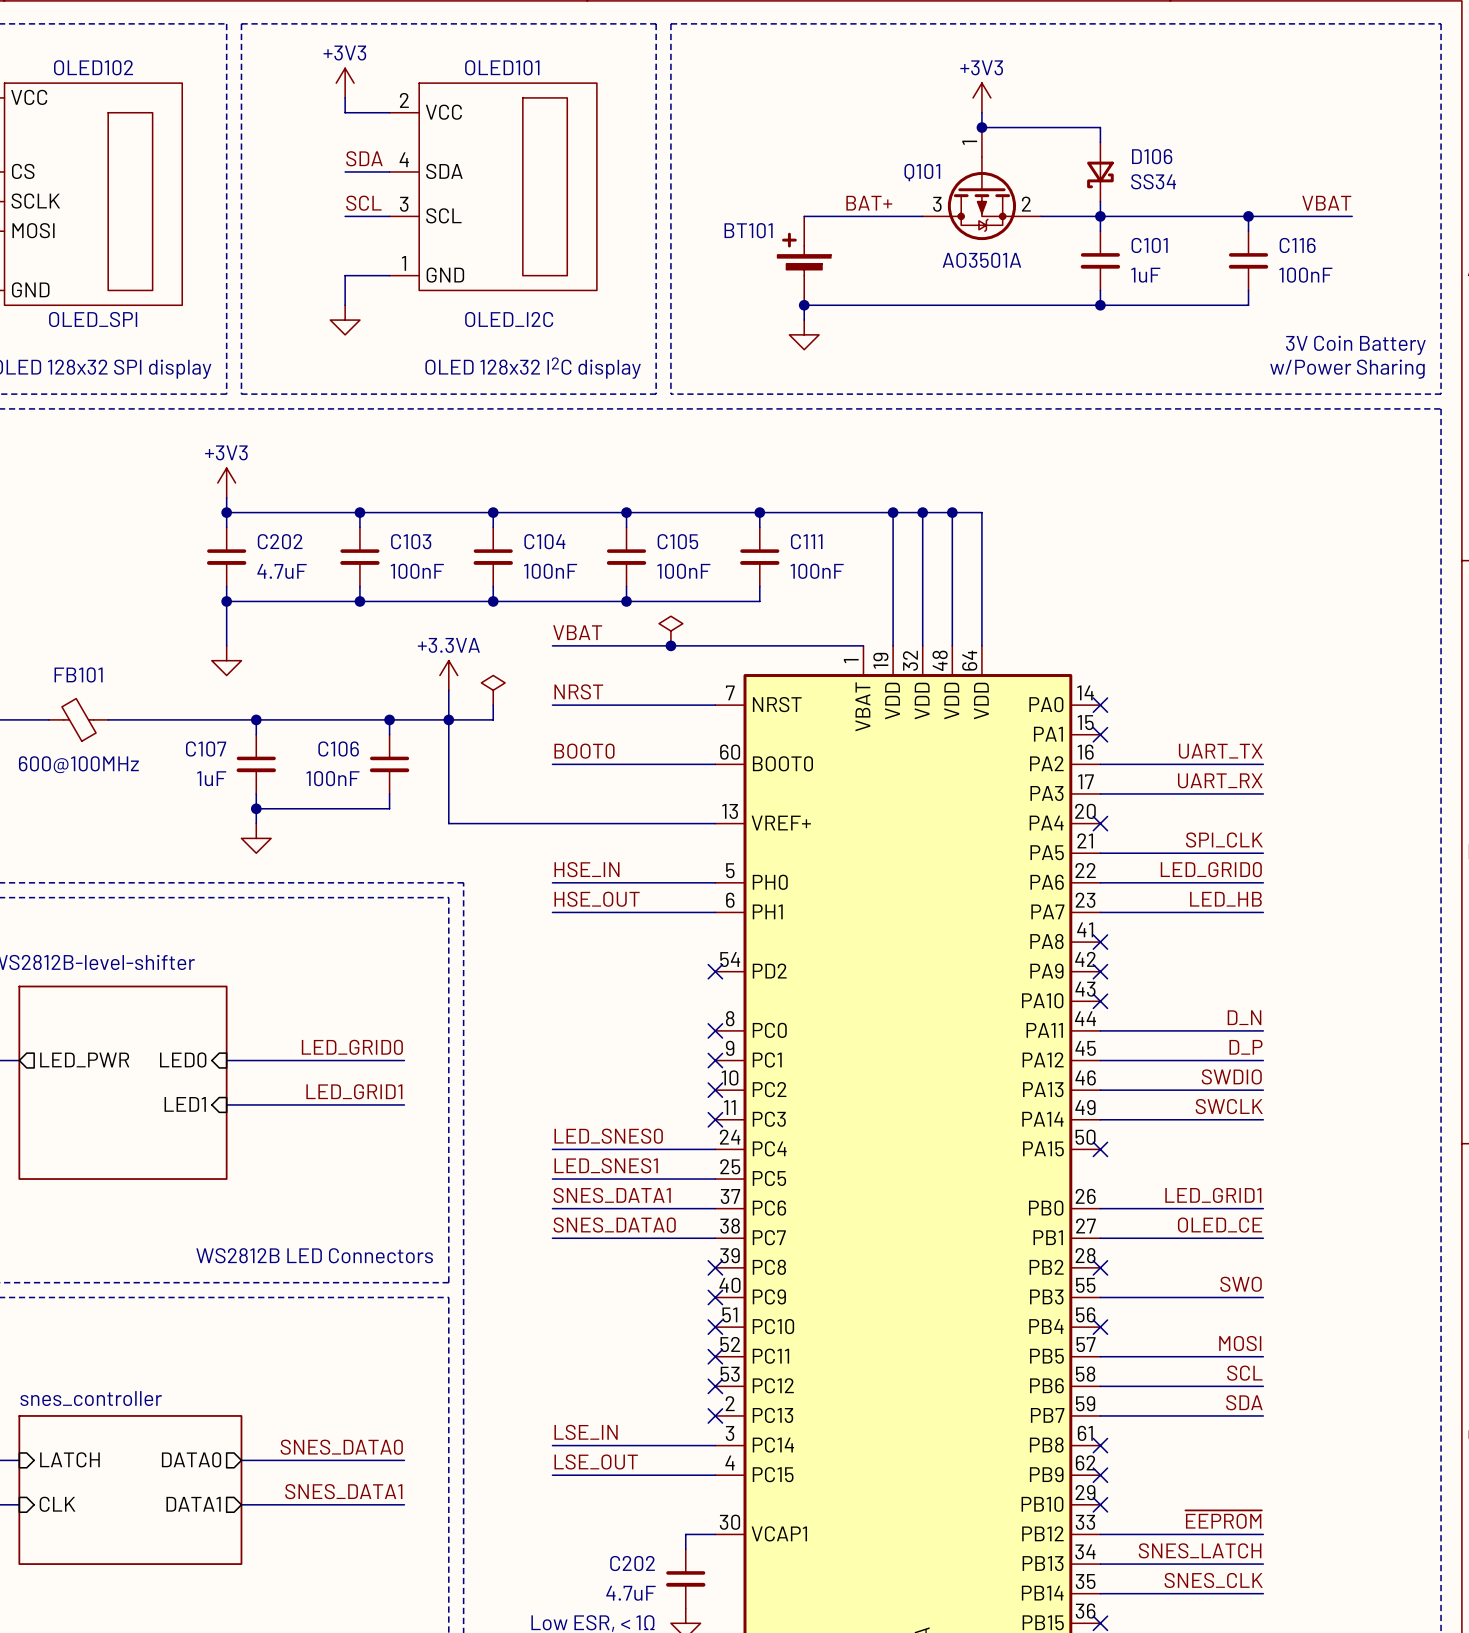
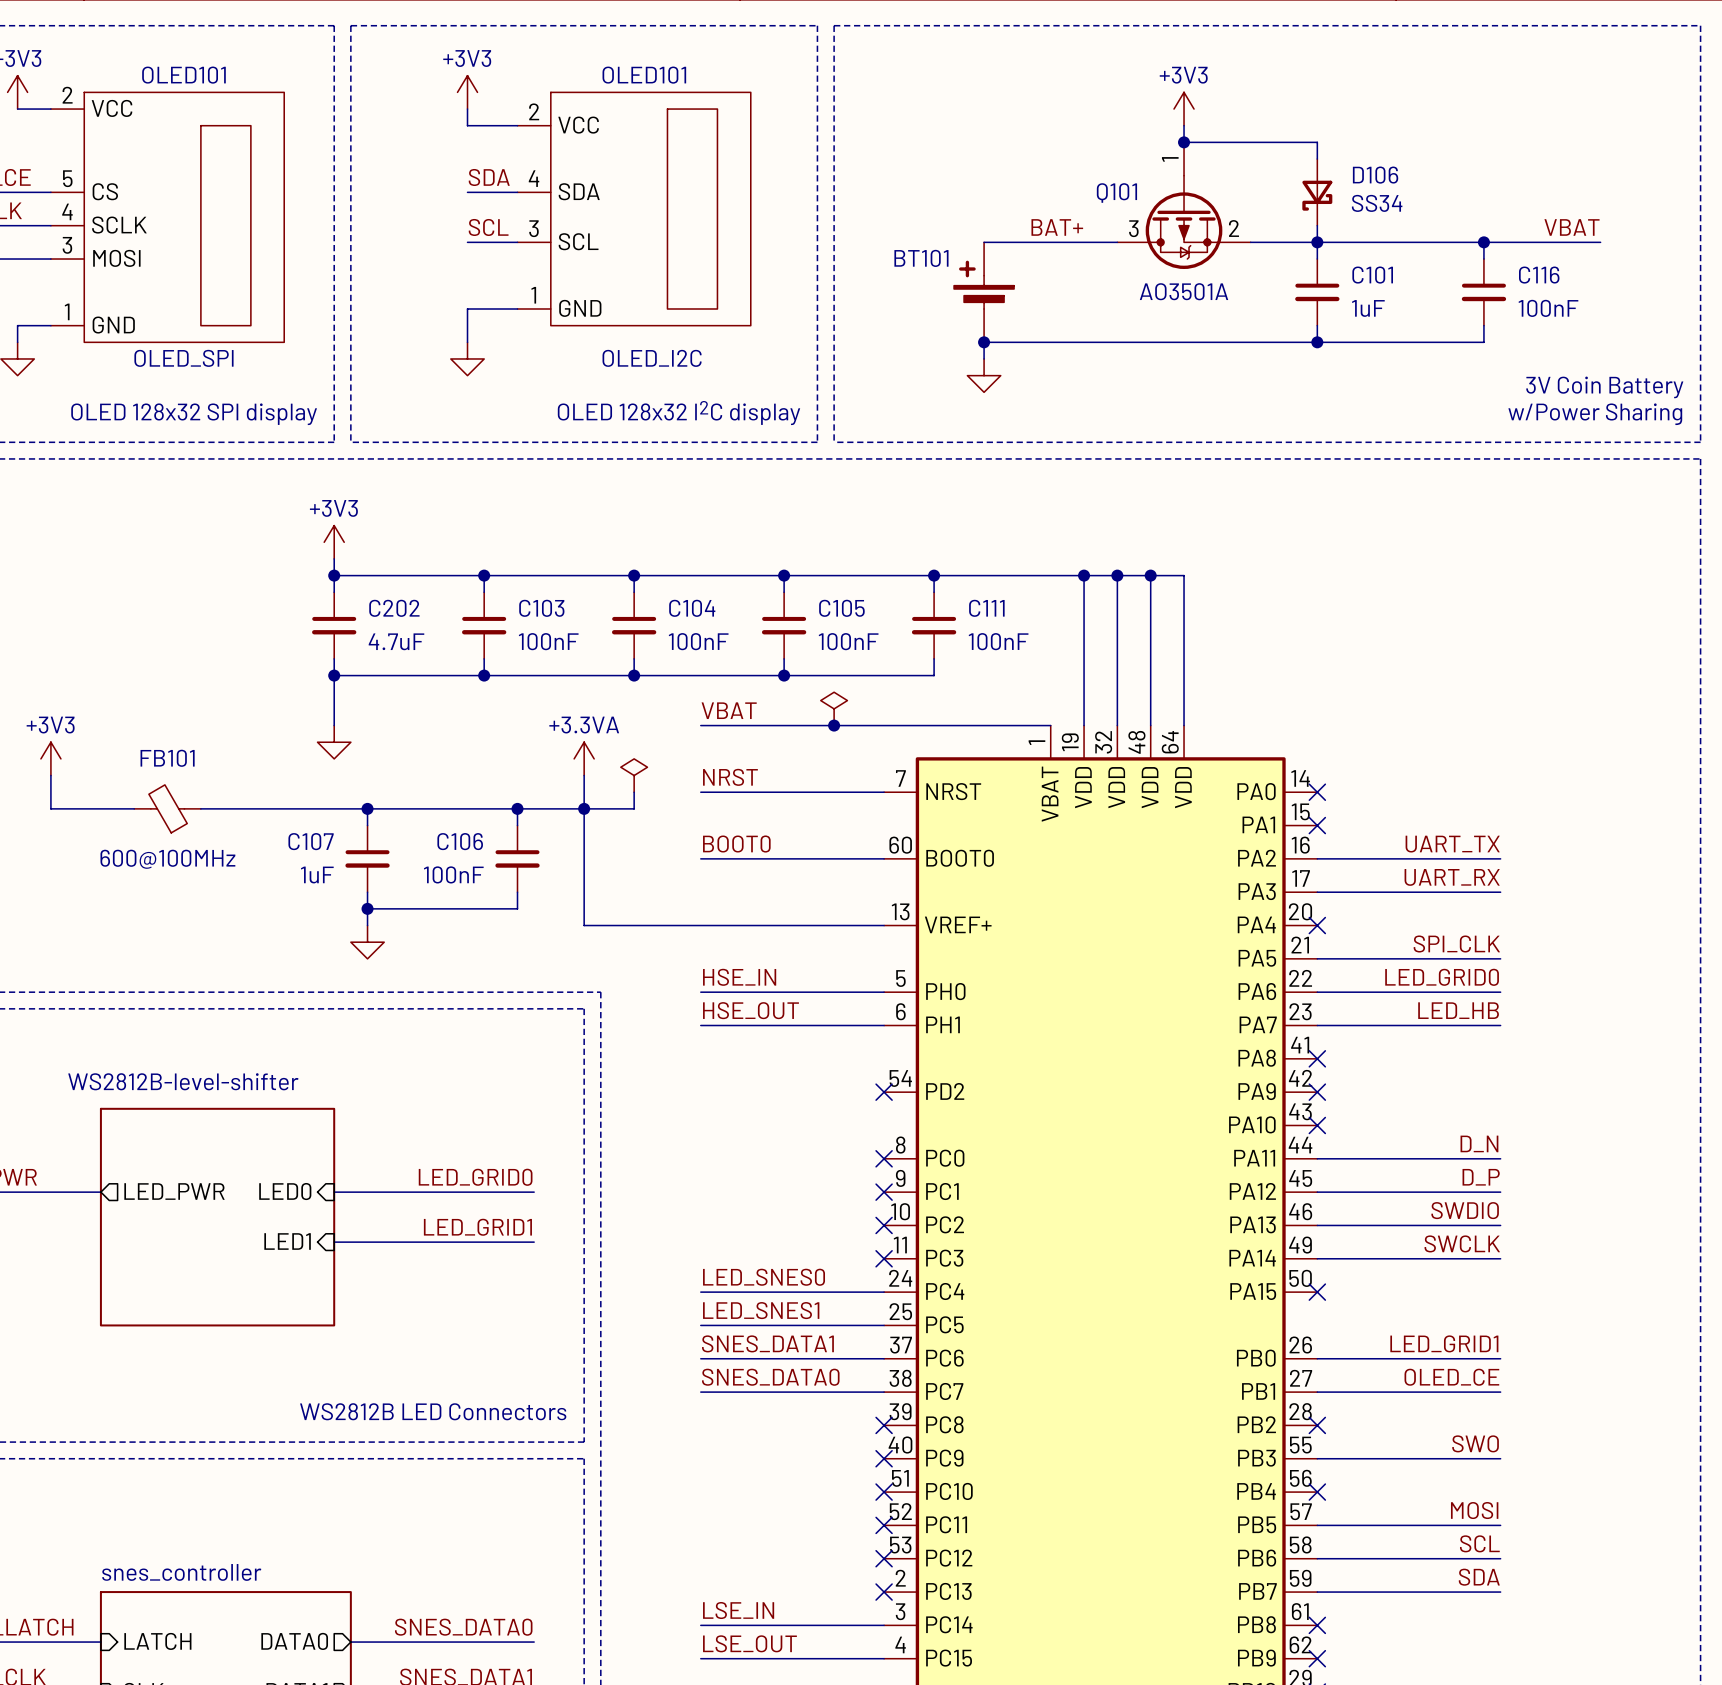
OLED102 name: OLED102 (93, 67) -> OLED101 (183, 75)

